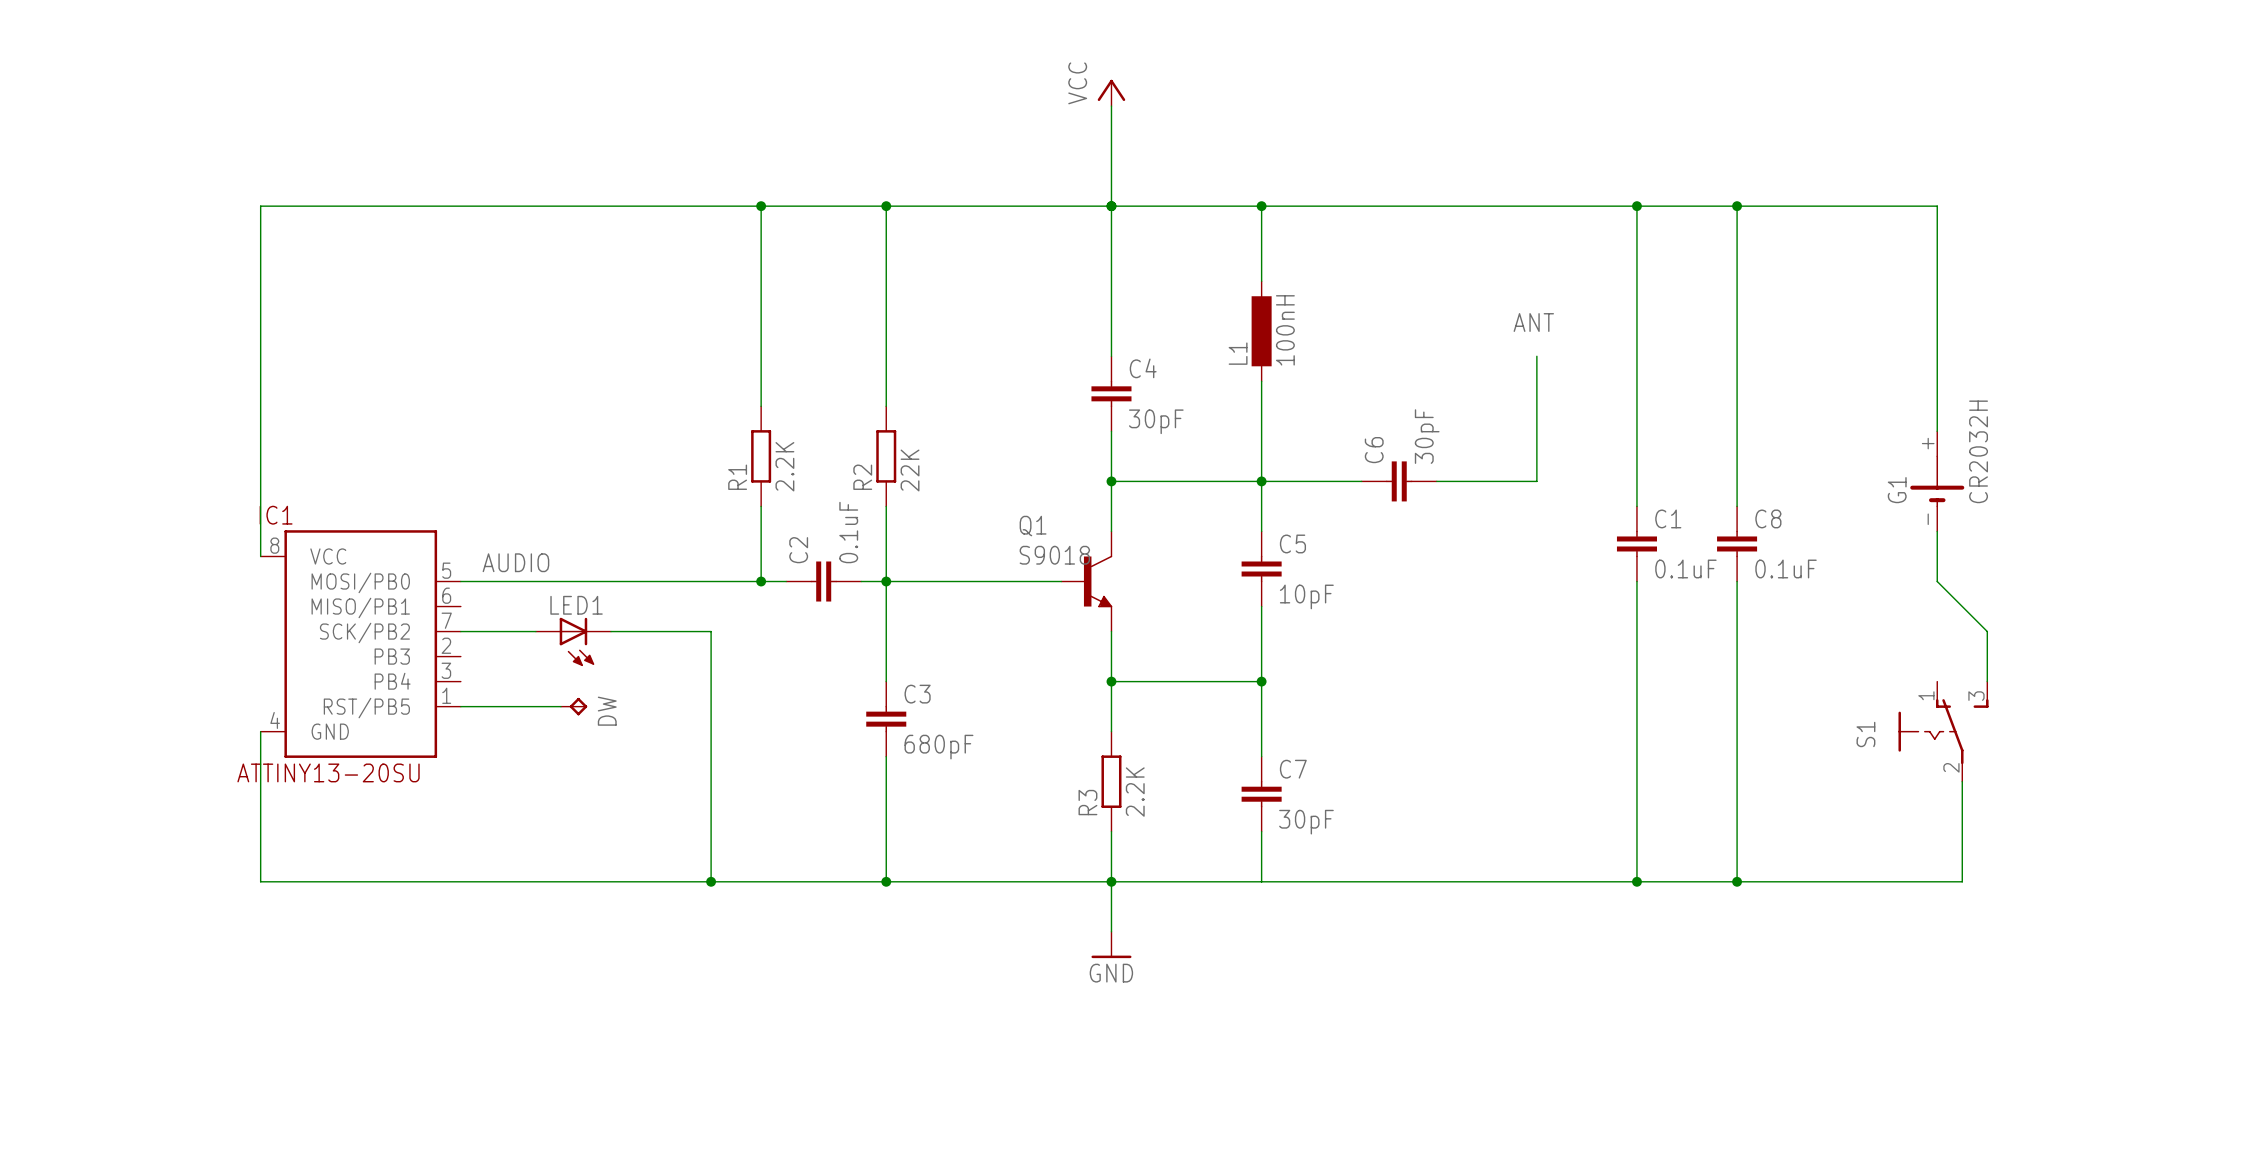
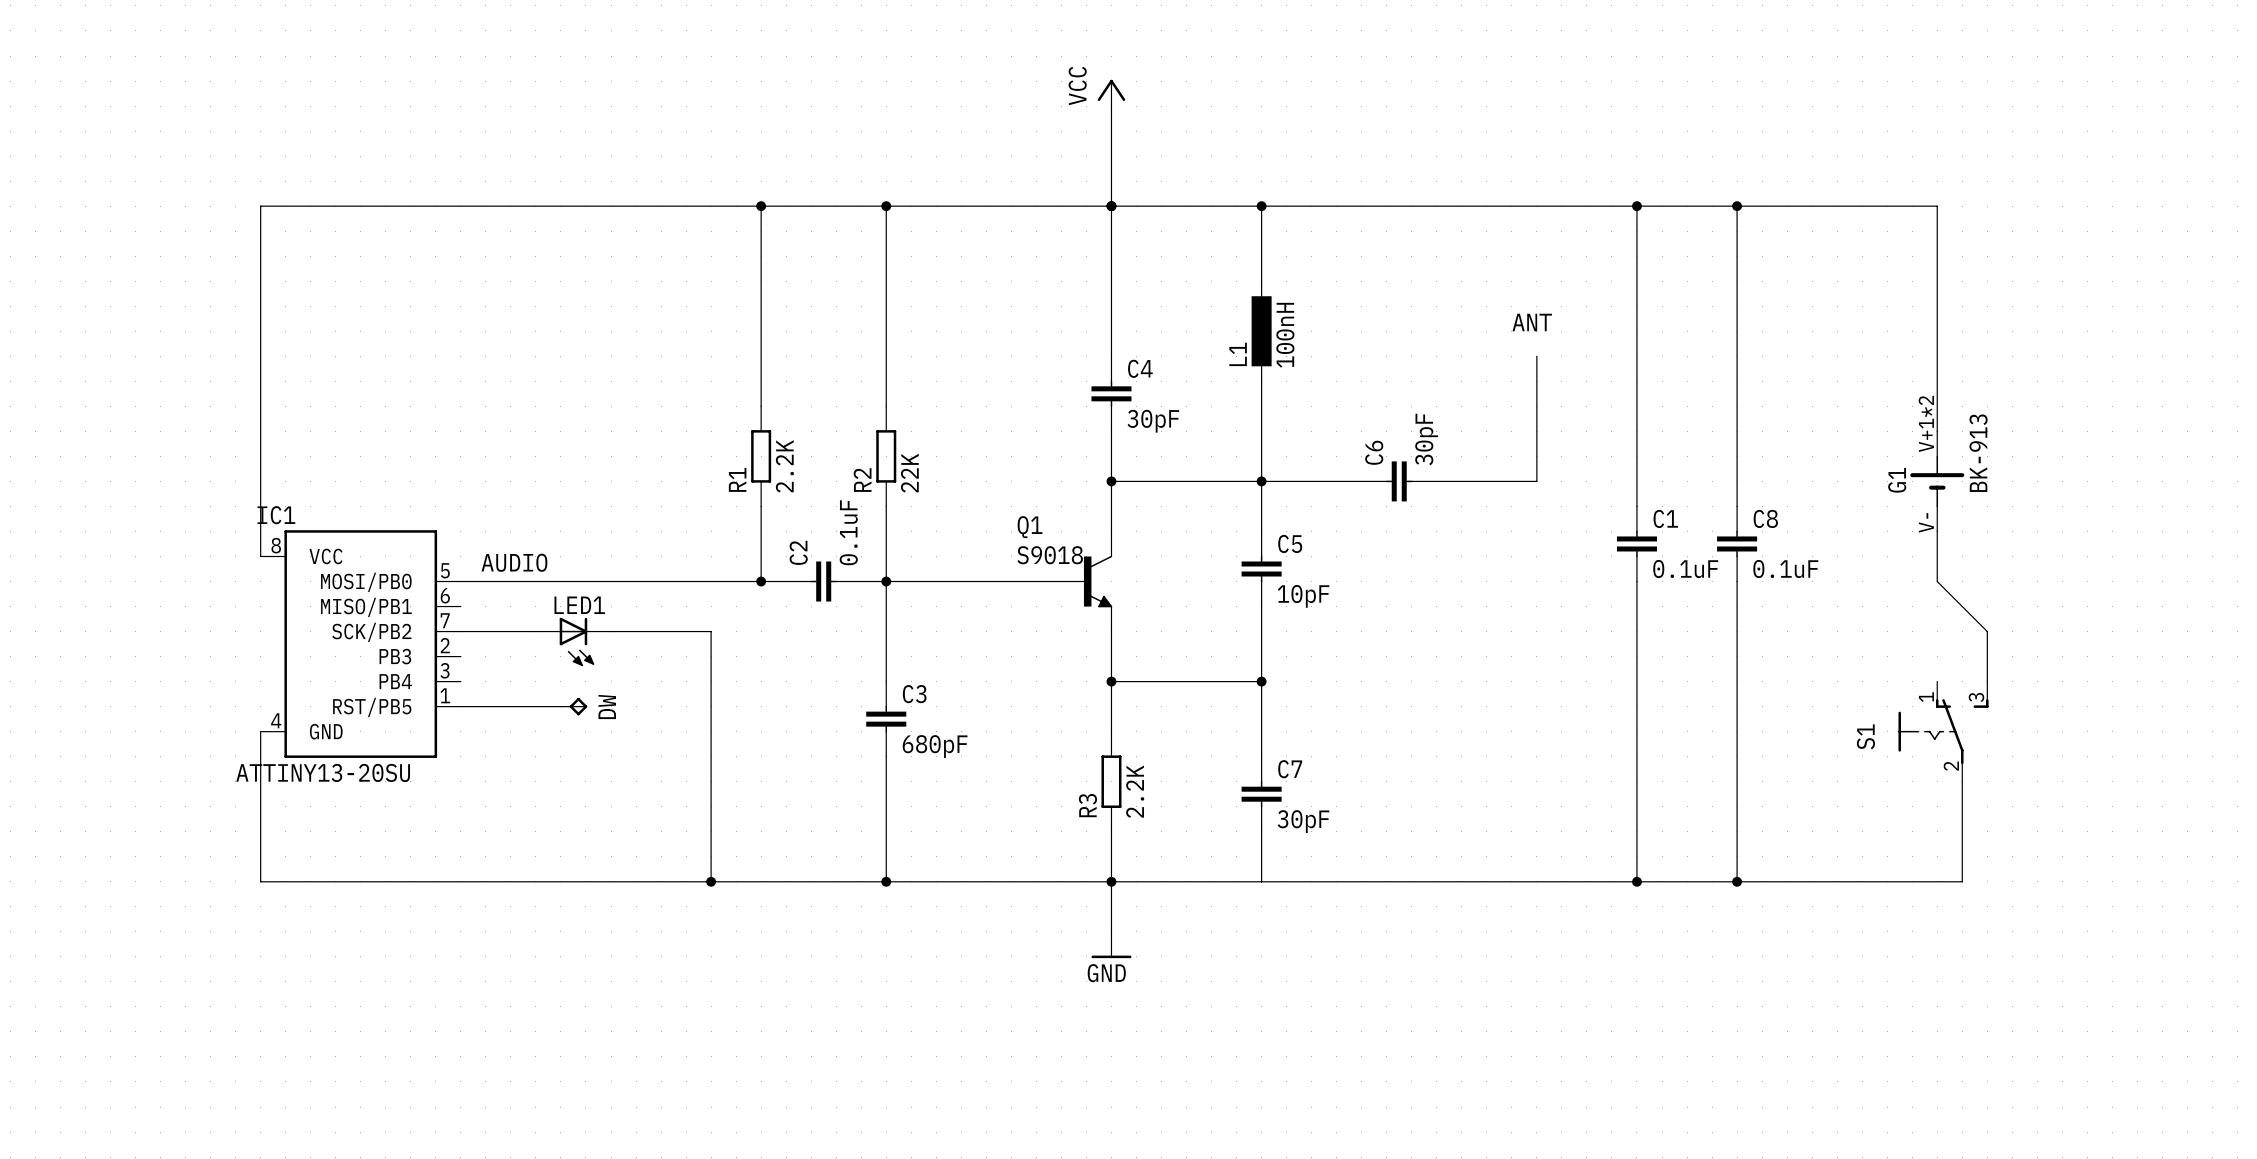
G1 symbol: [1910, 431, 1965, 532] -> [1910, 431, 1965, 532]
G1 value: CR2032H (1978, 451) -> BK-913 (1978, 453)

